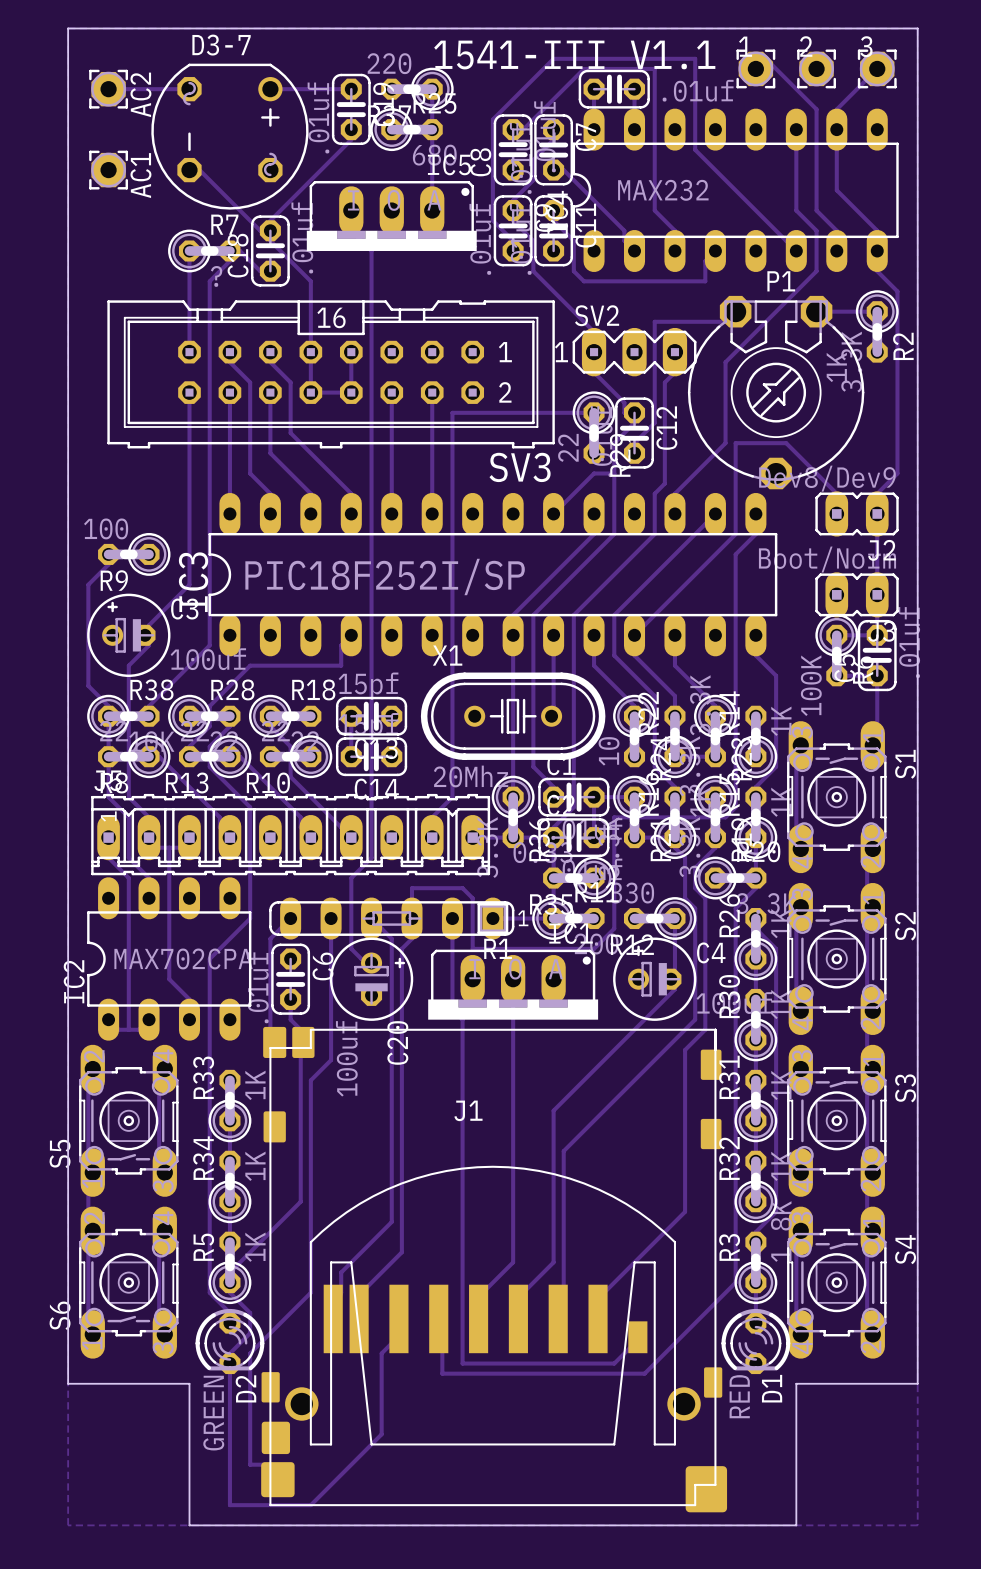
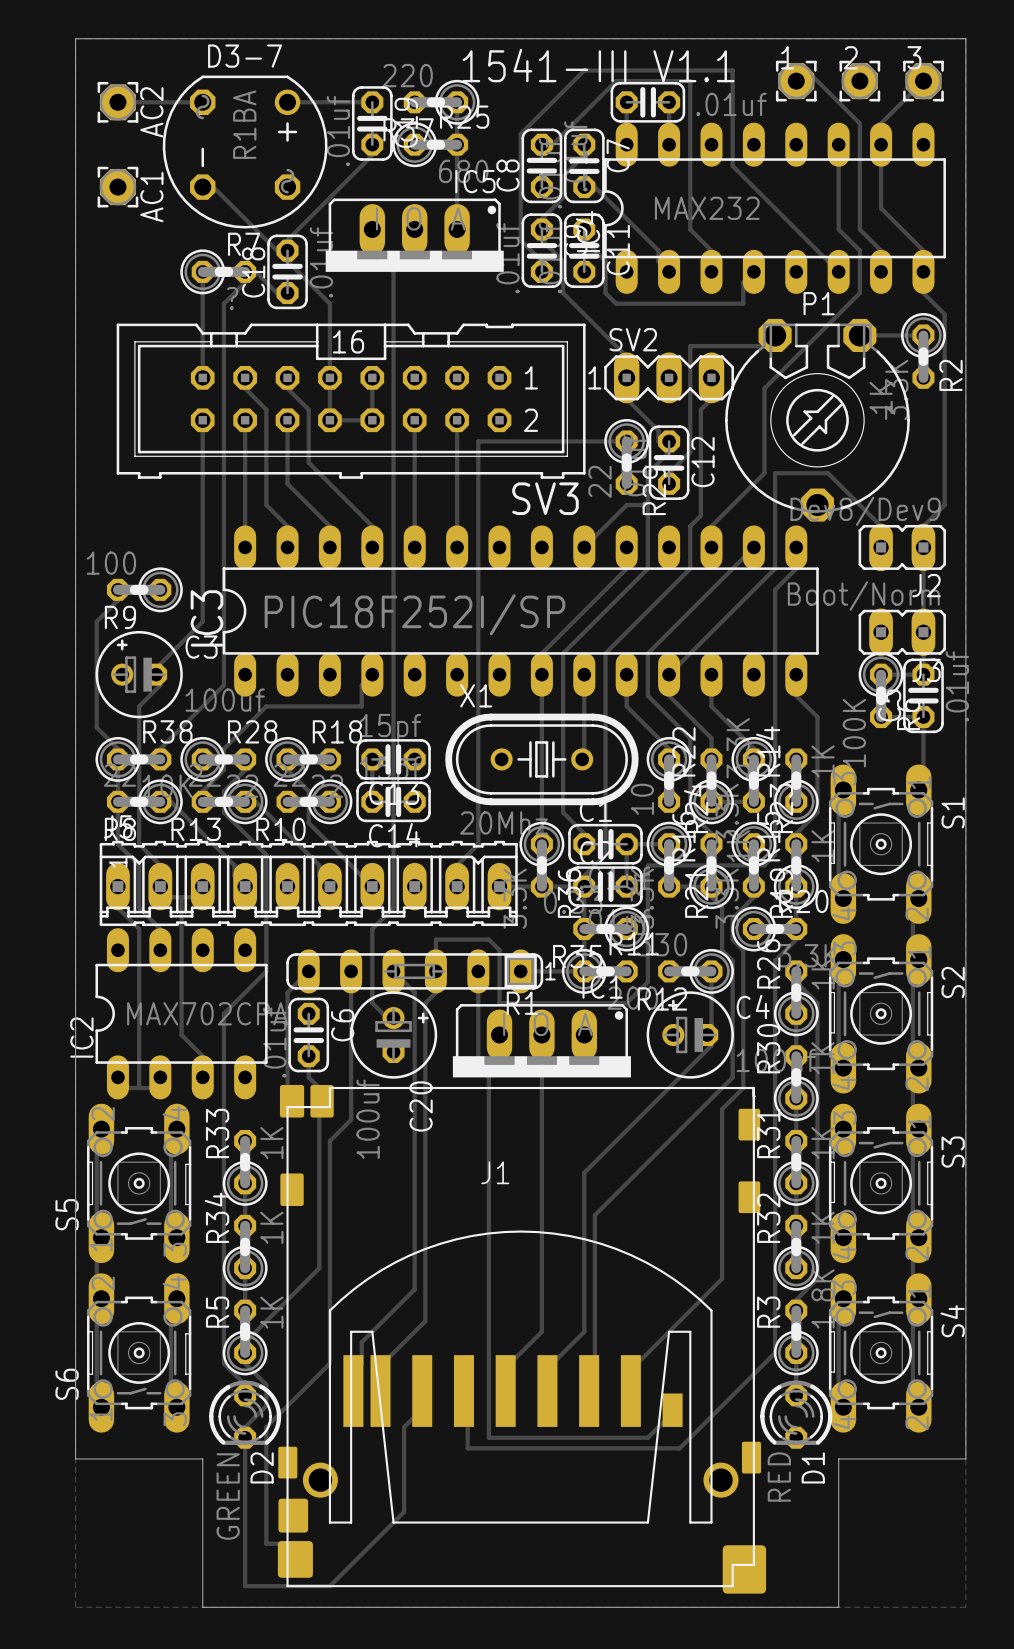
D3-7 value: none -> R1BA (244, 124)

